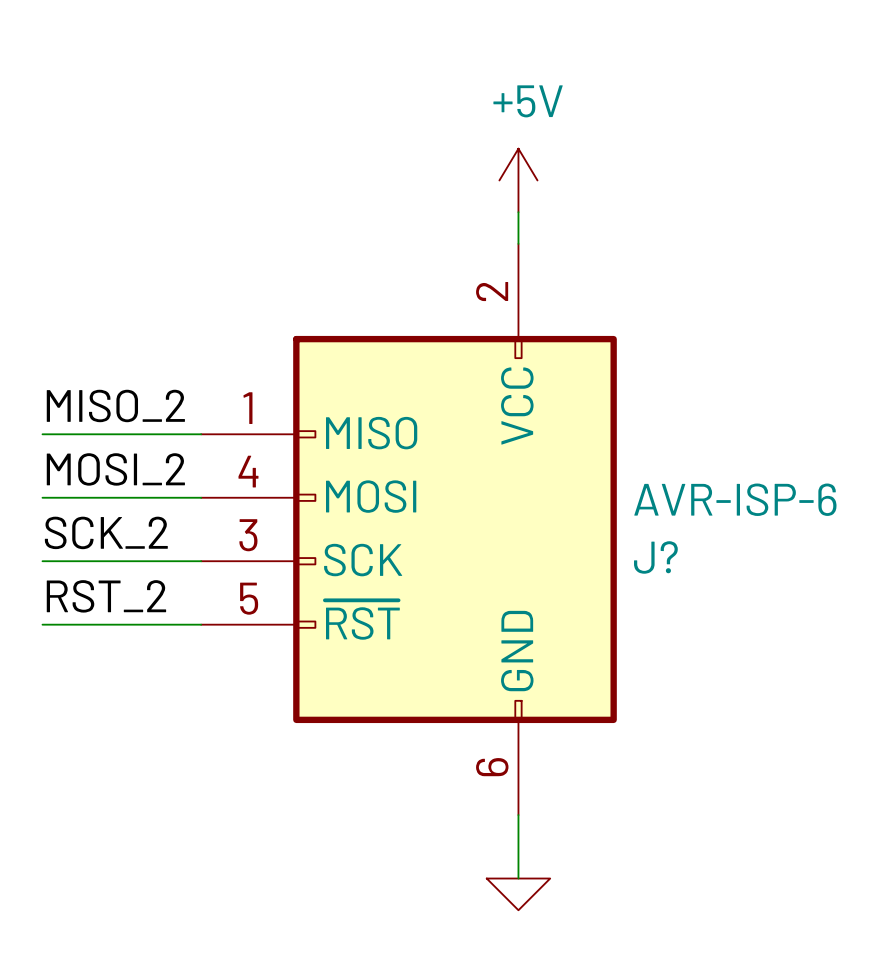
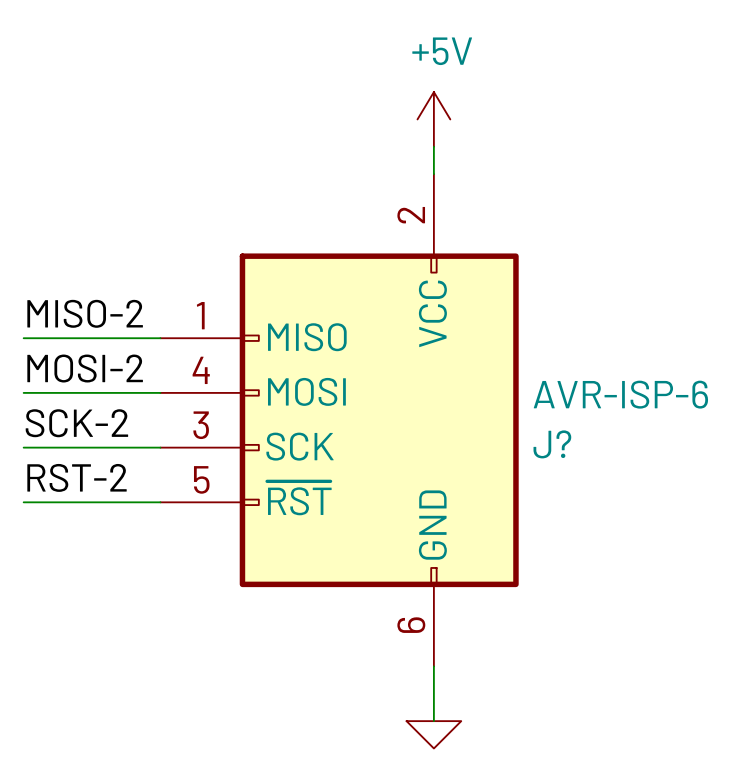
label: MISO_2 (115, 405) -> MISO-2 (85, 313)
label: MOSI_2 (115, 469) -> MOSI-2 (85, 368)
label: SCK_2 (106, 532) -> SCK-2 (76, 423)
label: RST_2 (106, 596) -> RST-2 (77, 477)

